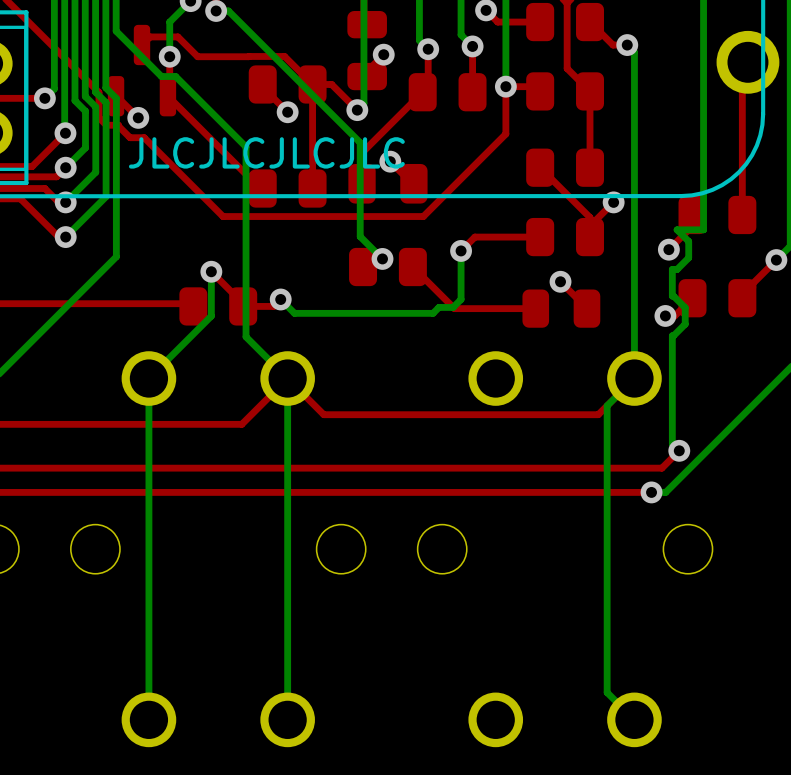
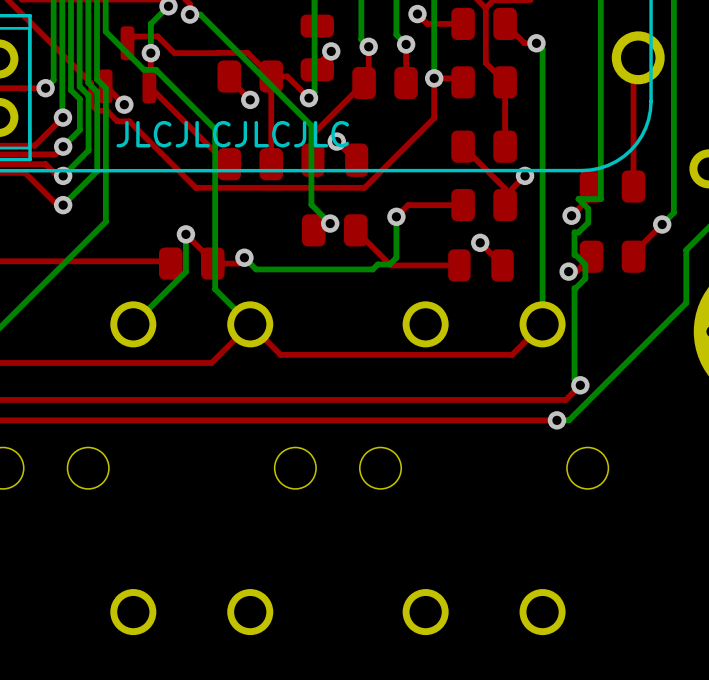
bottom track: (148, 378) (148, 719) -> none
bottom track: (287, 378) (287, 719) -> none
bottom track: (634, 378) (607, 405) (607, 692) (634, 719) -> none

